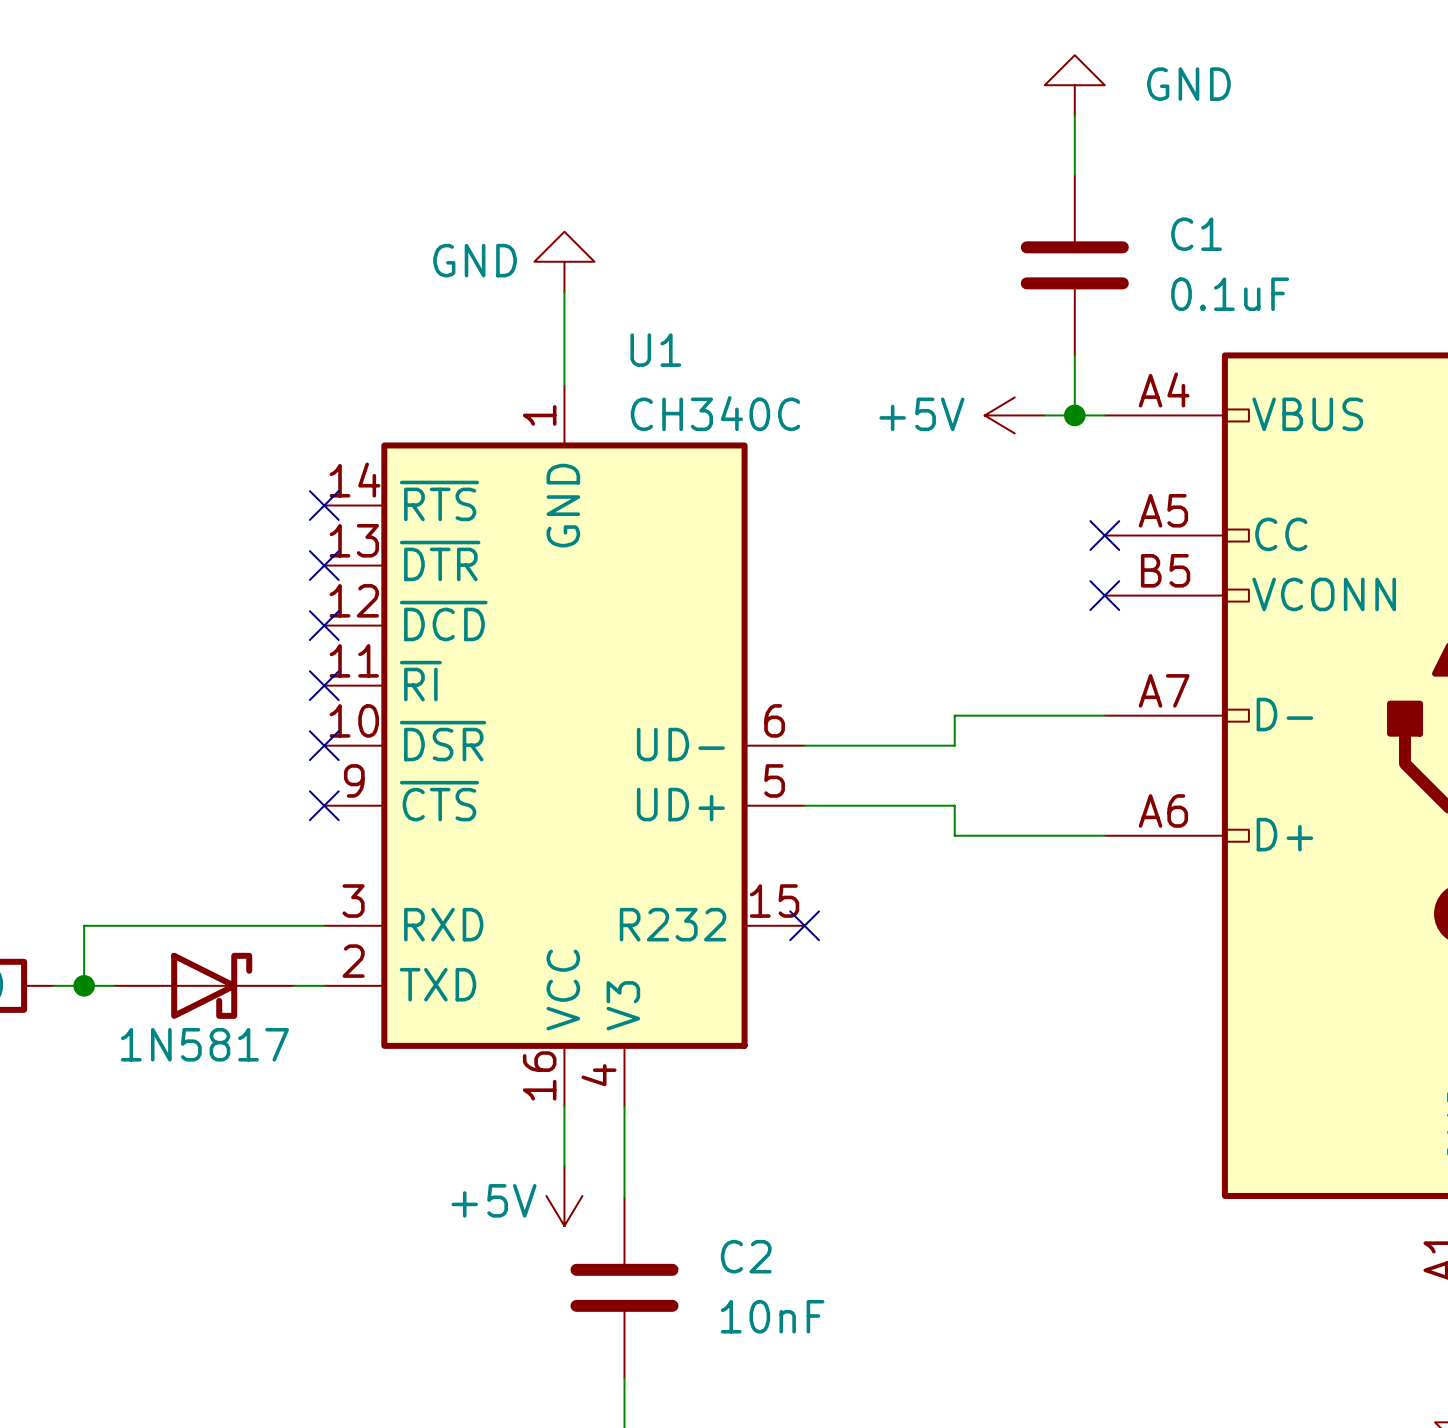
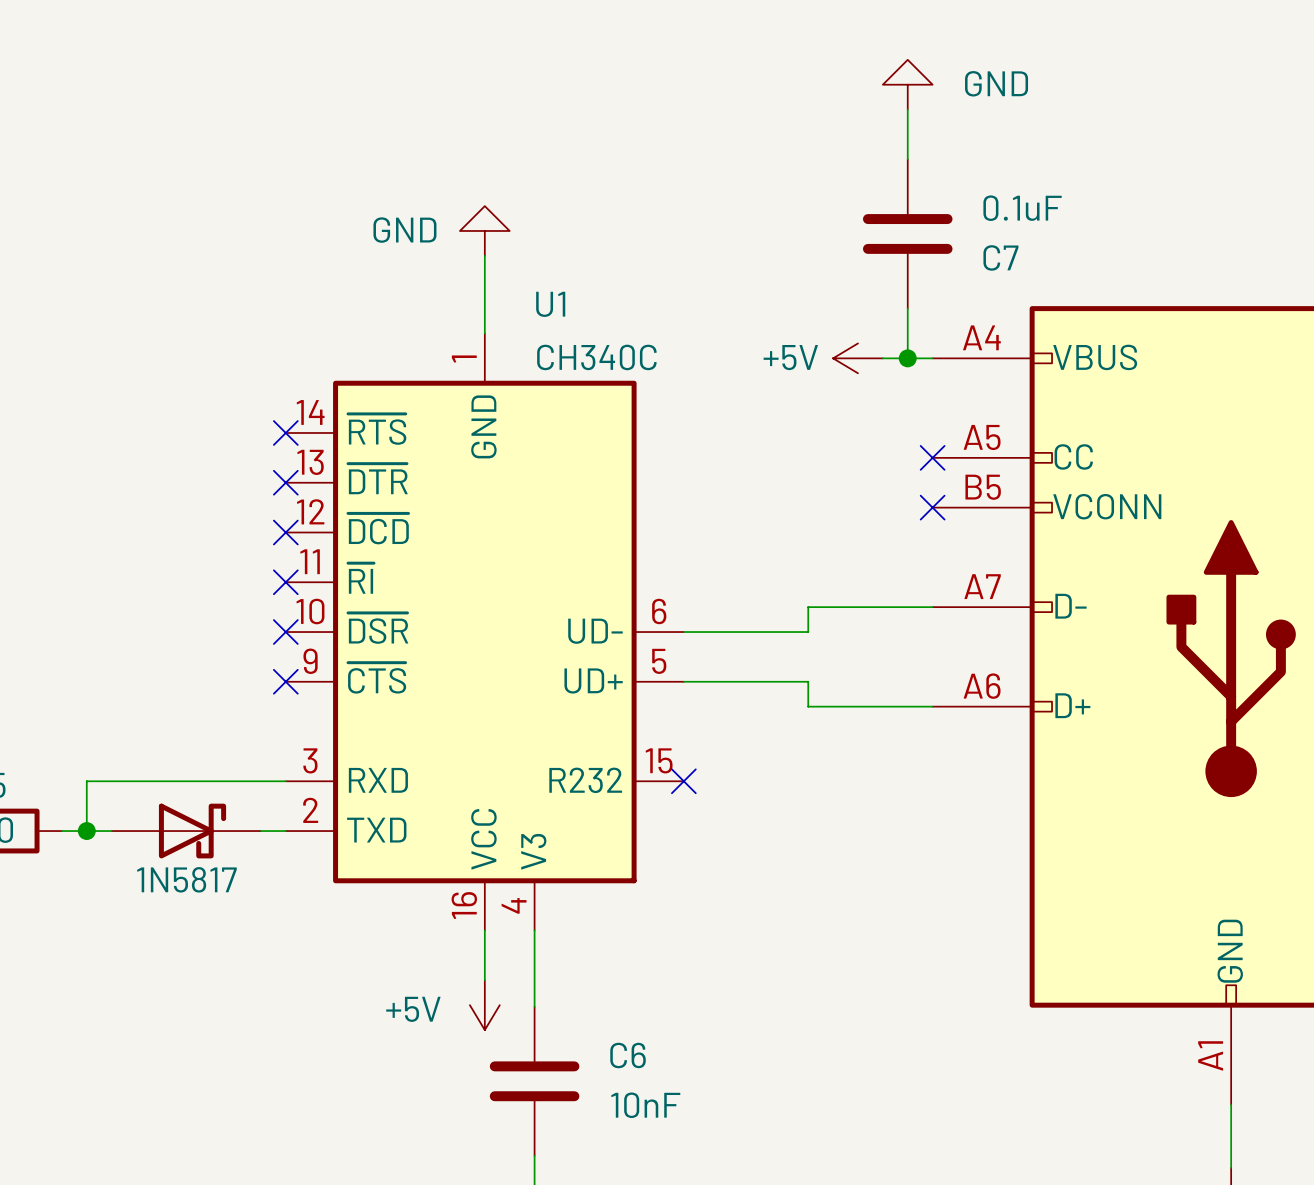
C1 name: C1 (1196, 234) -> C7 (1000, 257)
C1 value position: 0.1uF (1230, 294) -> 0.1uF (1022, 208)
C2 name: C2 (746, 1256) -> C6 (628, 1055)

